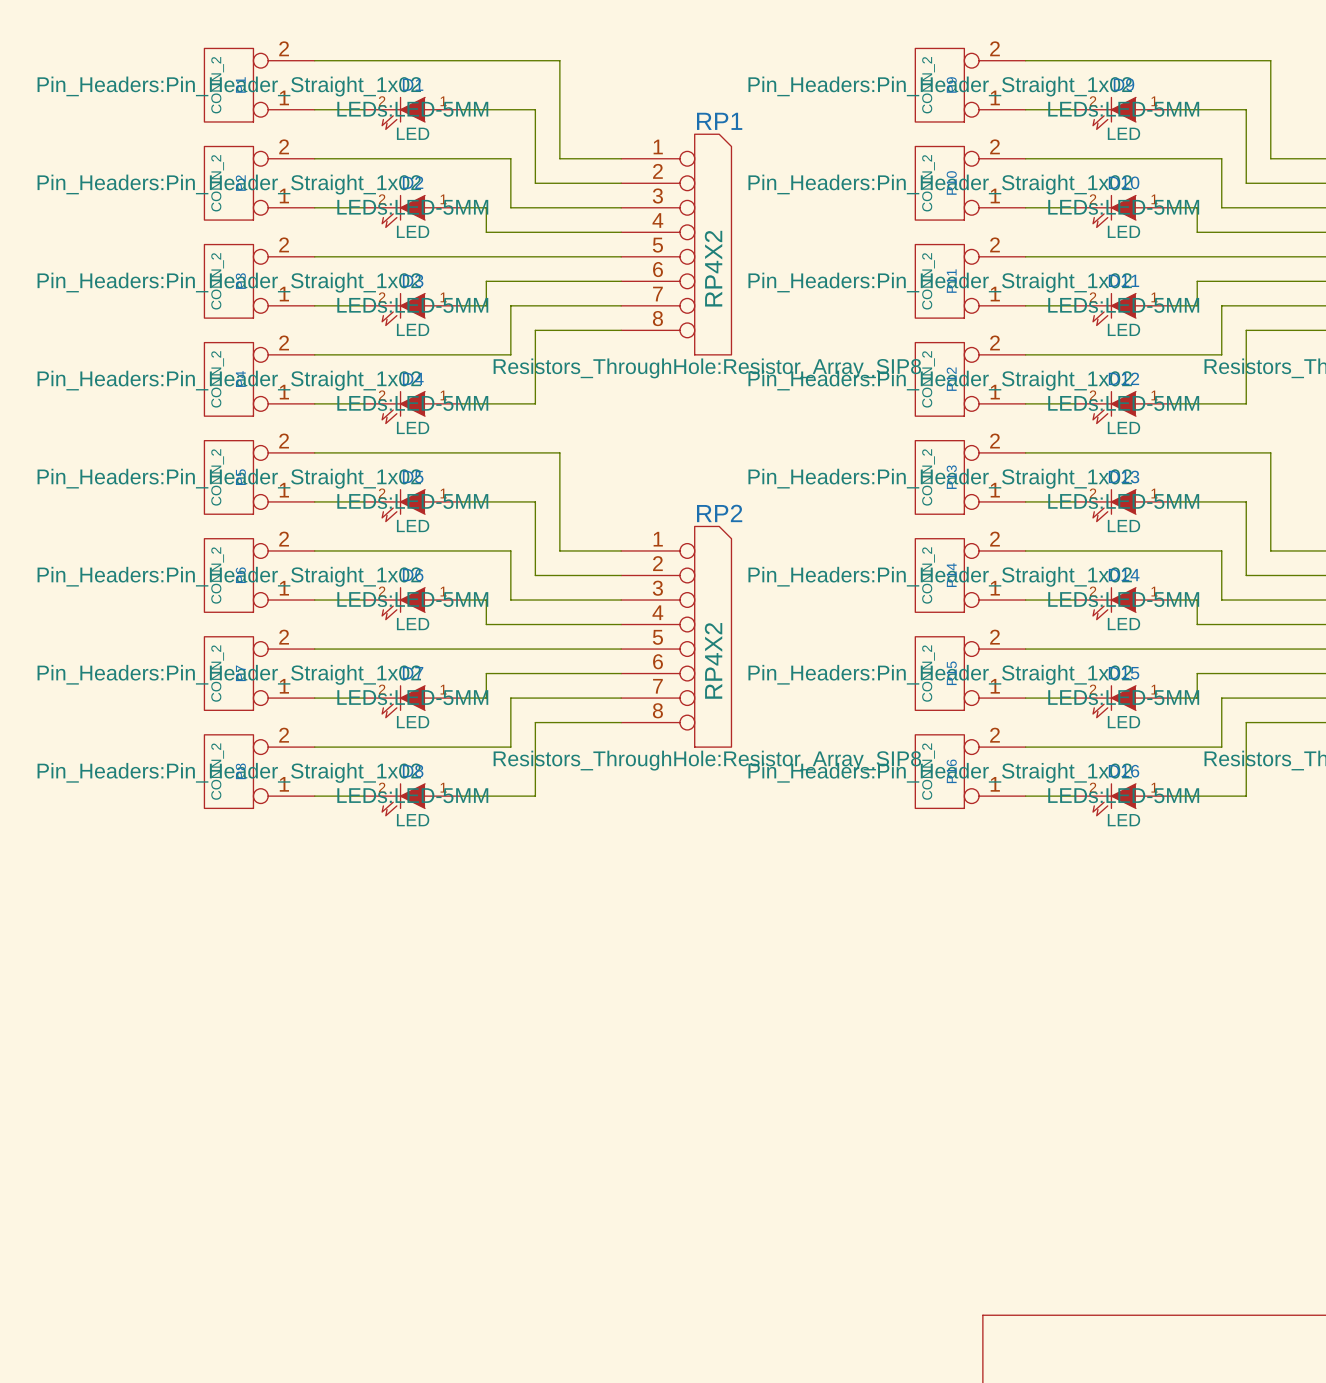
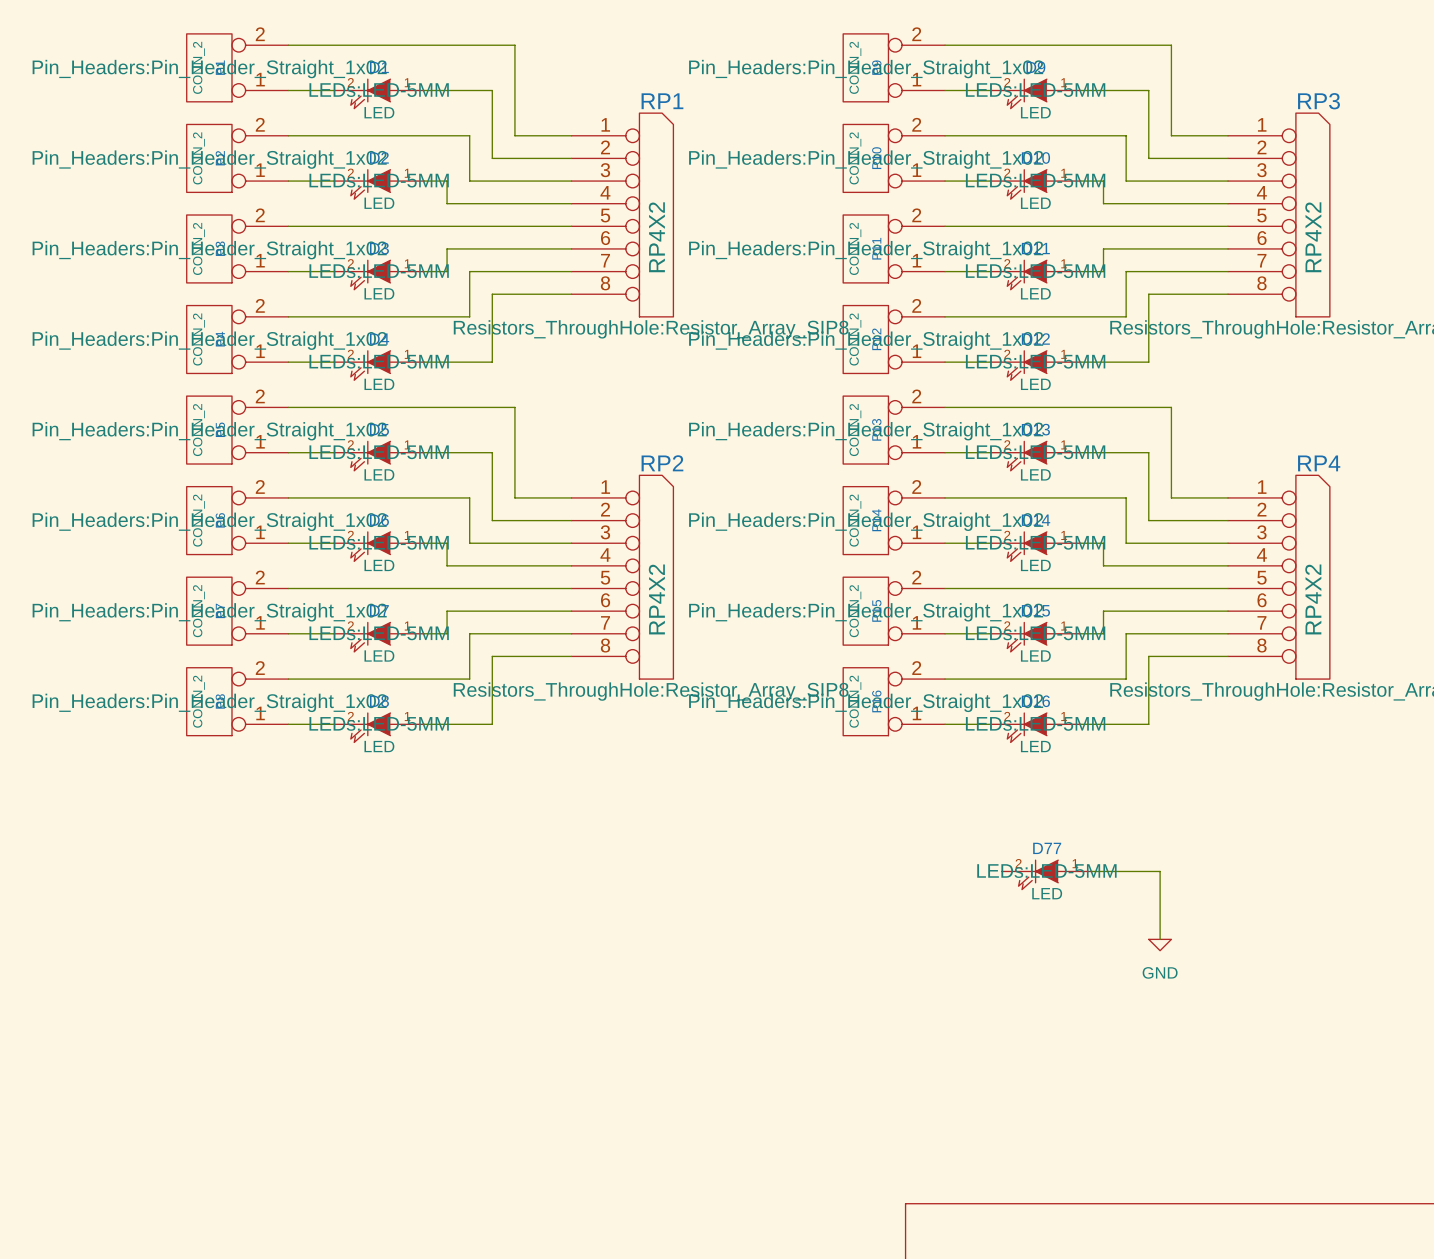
wire: none -> (1092, 871) (1160, 871) (1160, 939)
D77: none -> LED (1046, 874)
power symbol: none -> GND (1160, 945)

